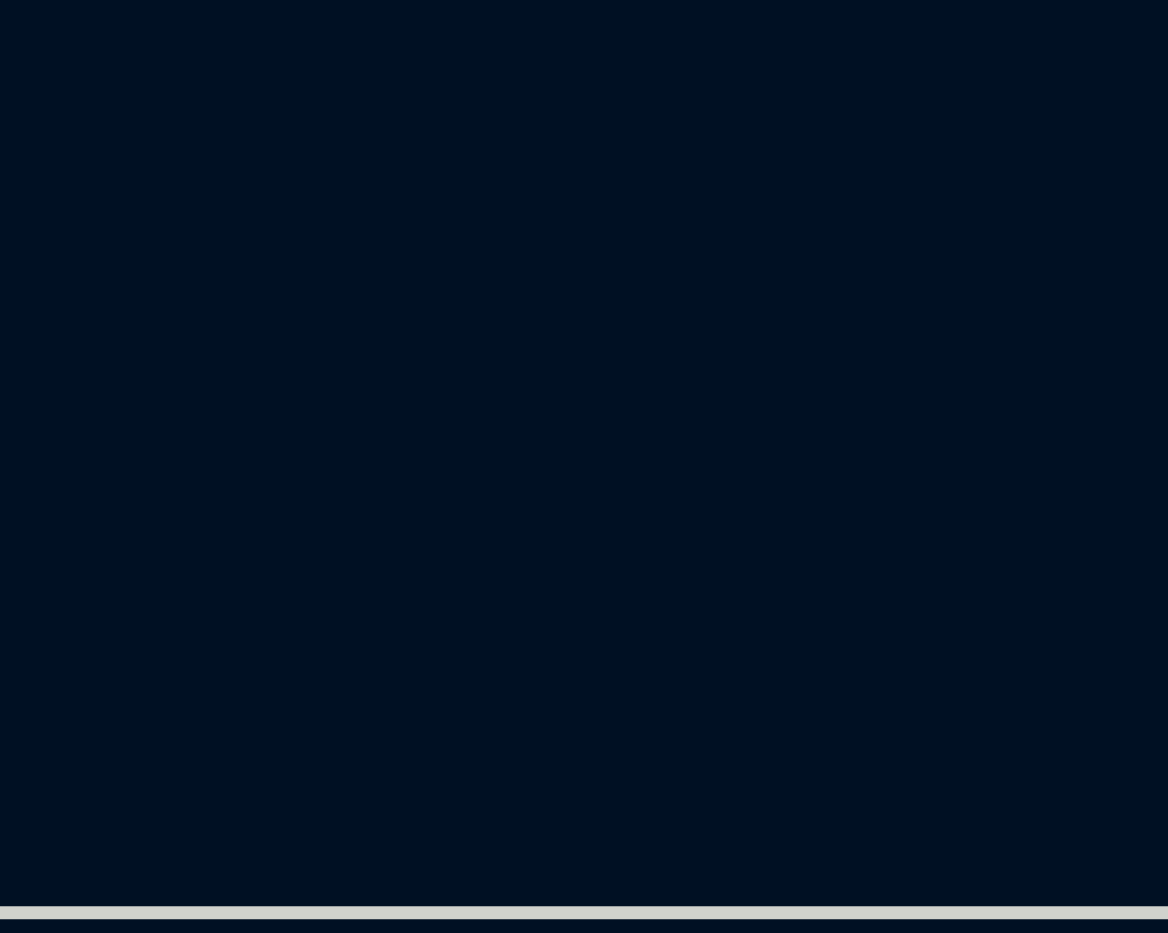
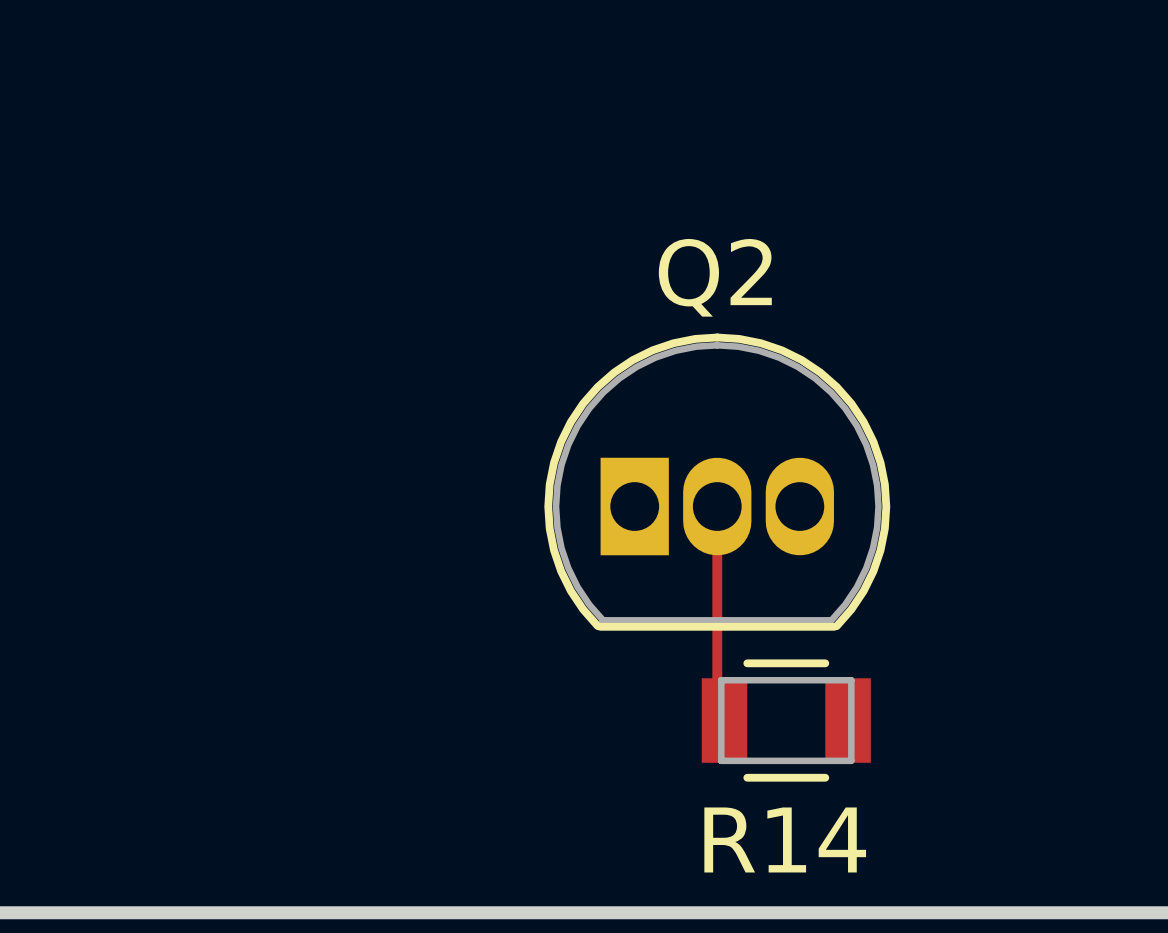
Q2: none -> (717, 482)
top track: none -> (717, 506) (717, 713) (724, 720)
R14: none -> (786, 720)

